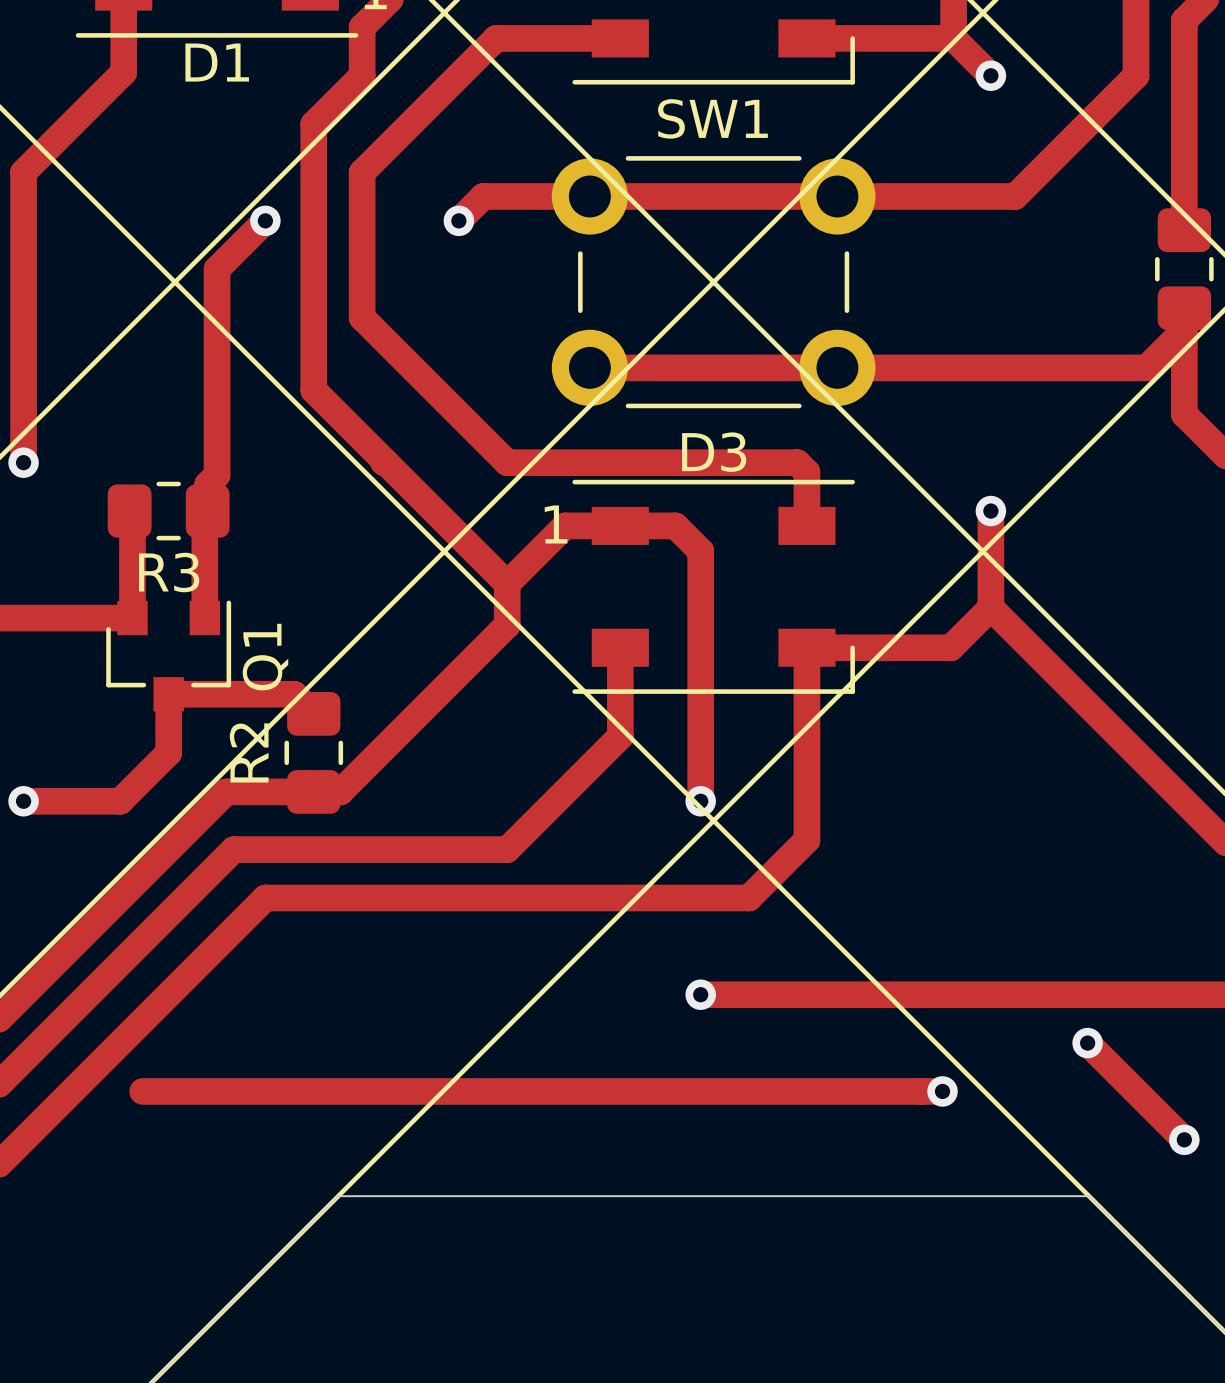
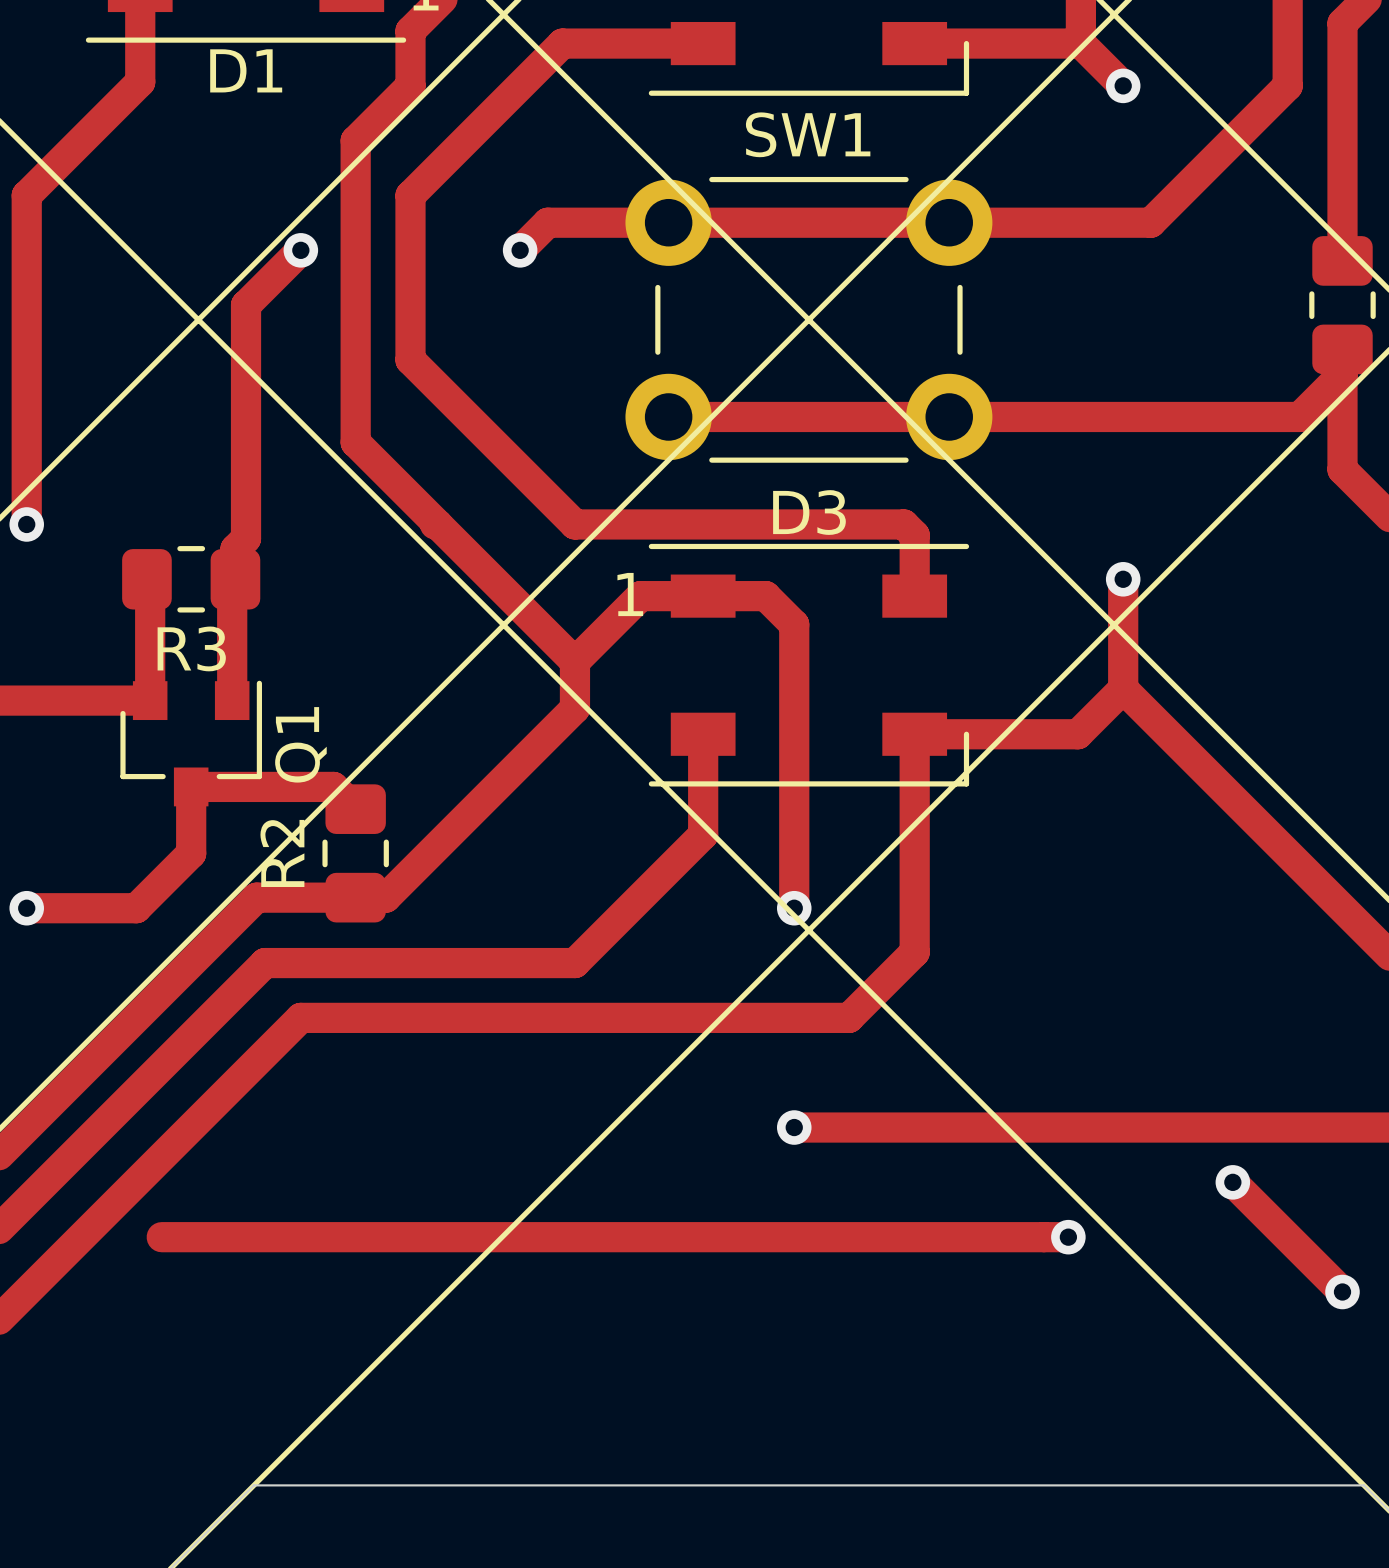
board edge: (223, 1310) (338, 1196) (1089, 1196) (1203, 1310) -> (253, 1485) (1363, 1485)

